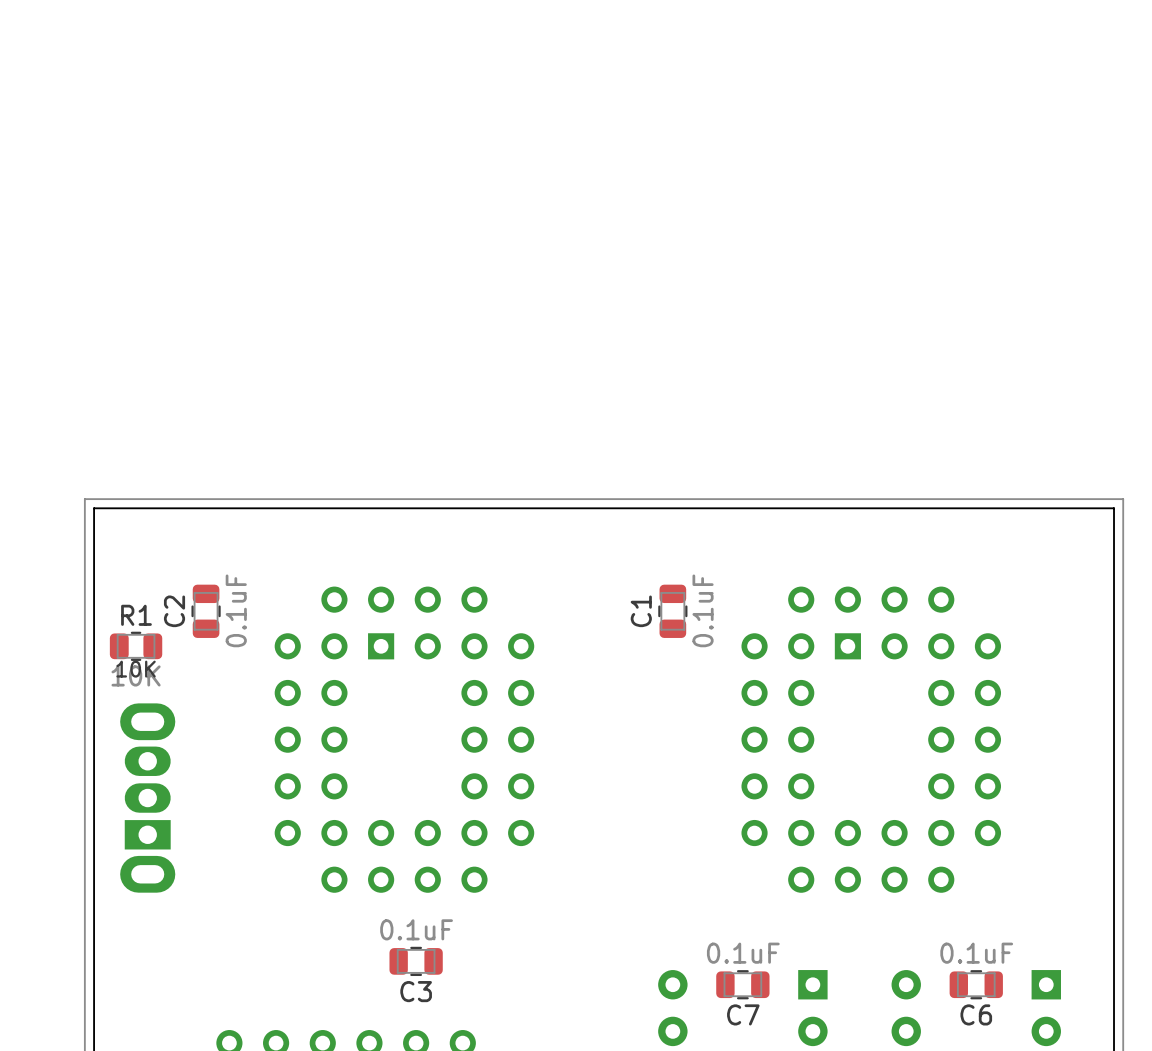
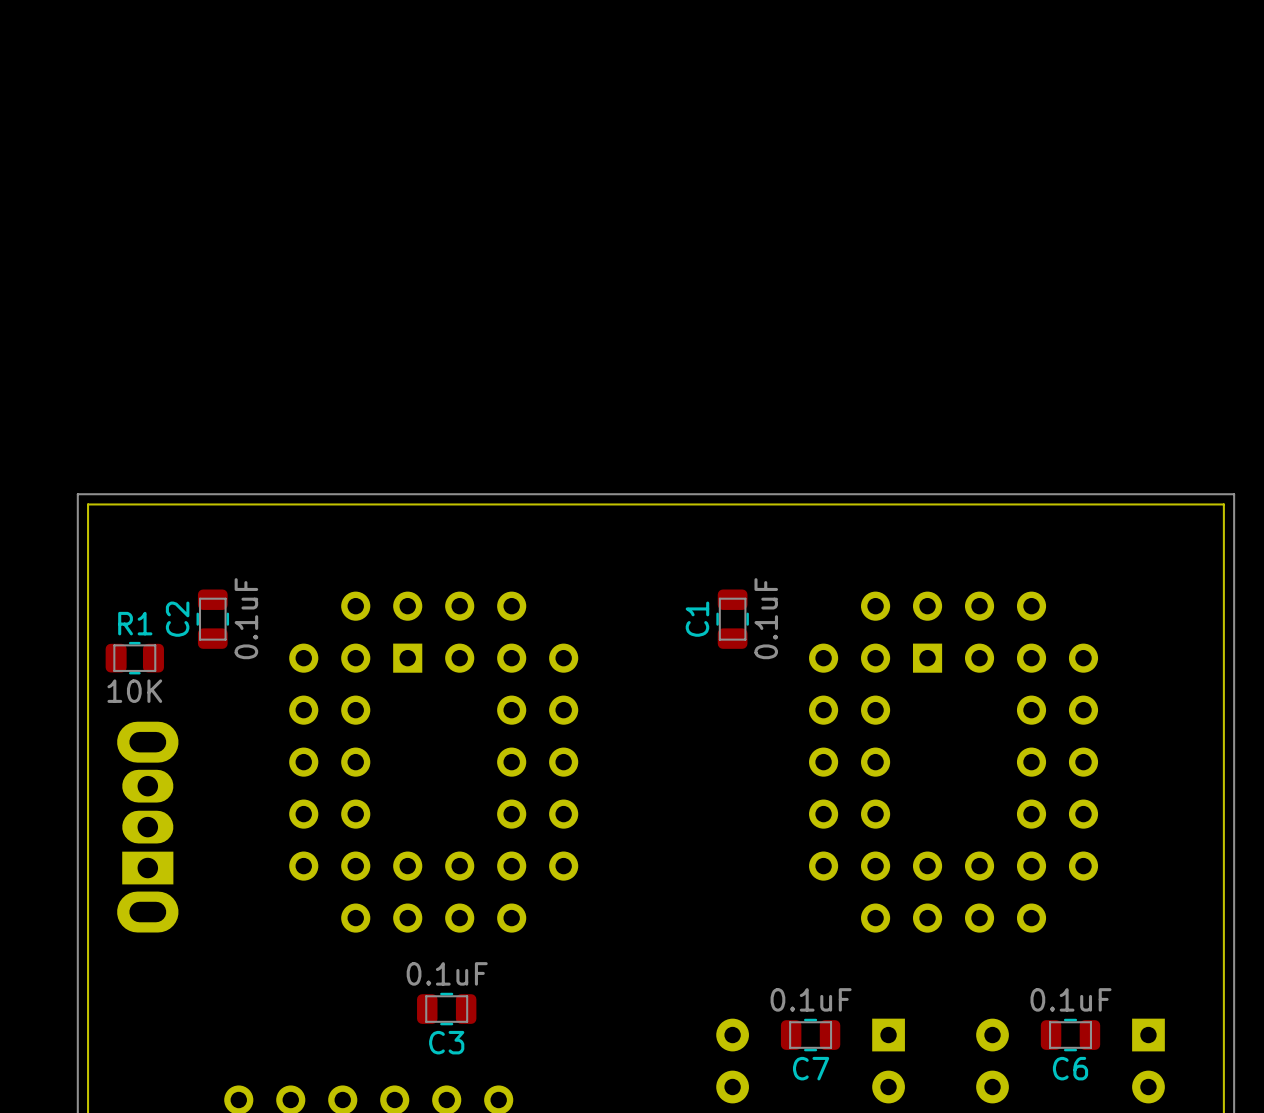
text: 10K (136, 669) -> none

